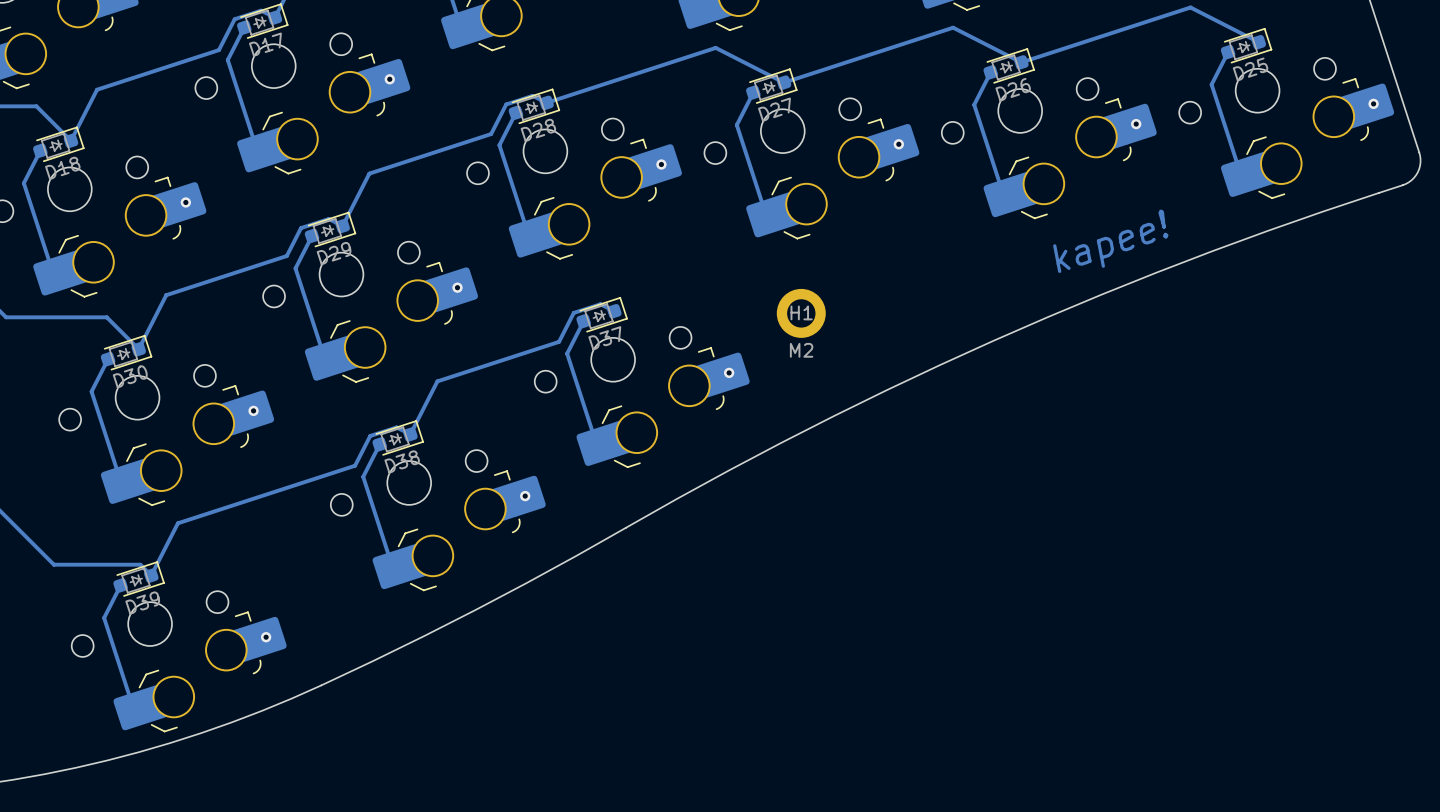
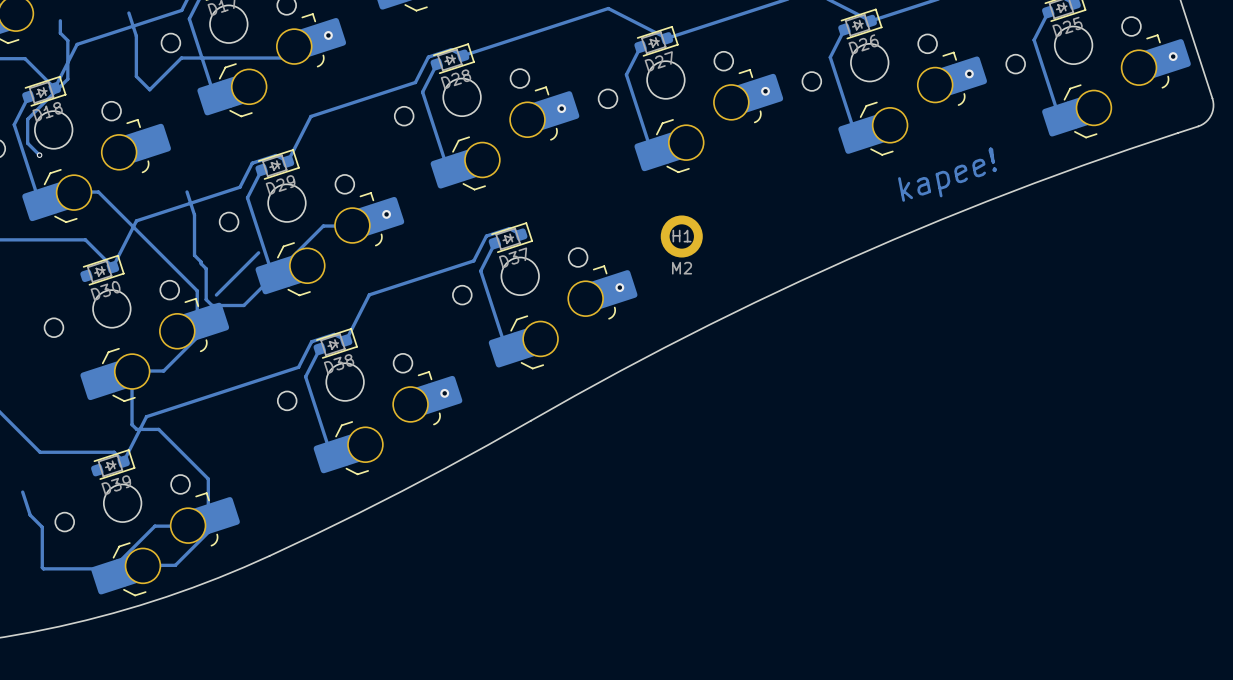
track: none -> (128, 13) (136, 36) (136, 76) (149, 89) (181, 58) (283, 58) (294, 47)
track: none -> (60, 20) (60, 33) (67, 40) (67, 79) (27, 119) (27, 143) (39, 155)
via: (185, 202) -> none
via: none -> (39, 155)
track: none -> (73, 192) (98, 192) (197, 290) (197, 337) (163, 371) (132, 371) (132, 424) (136, 429) (158, 429) (208, 478) (208, 532) (175, 565) (142, 565)
track: none -> (187, 191) (194, 215) (194, 255) (206, 268) (206, 299) (212, 305) (243, 305) (323, 226) (352, 226)
track: none -> (258, 252) (216, 295)
track: (108, 359) (91, 391) (121, 483) -> none
via: (253, 410) -> none
track: (120, 585) (104, 617) (134, 709) -> none
track: none -> (22, 492) (30, 515) (42, 527) (43, 568) (112, 568) (154, 526) (188, 526)
via: (266, 637) -> none

